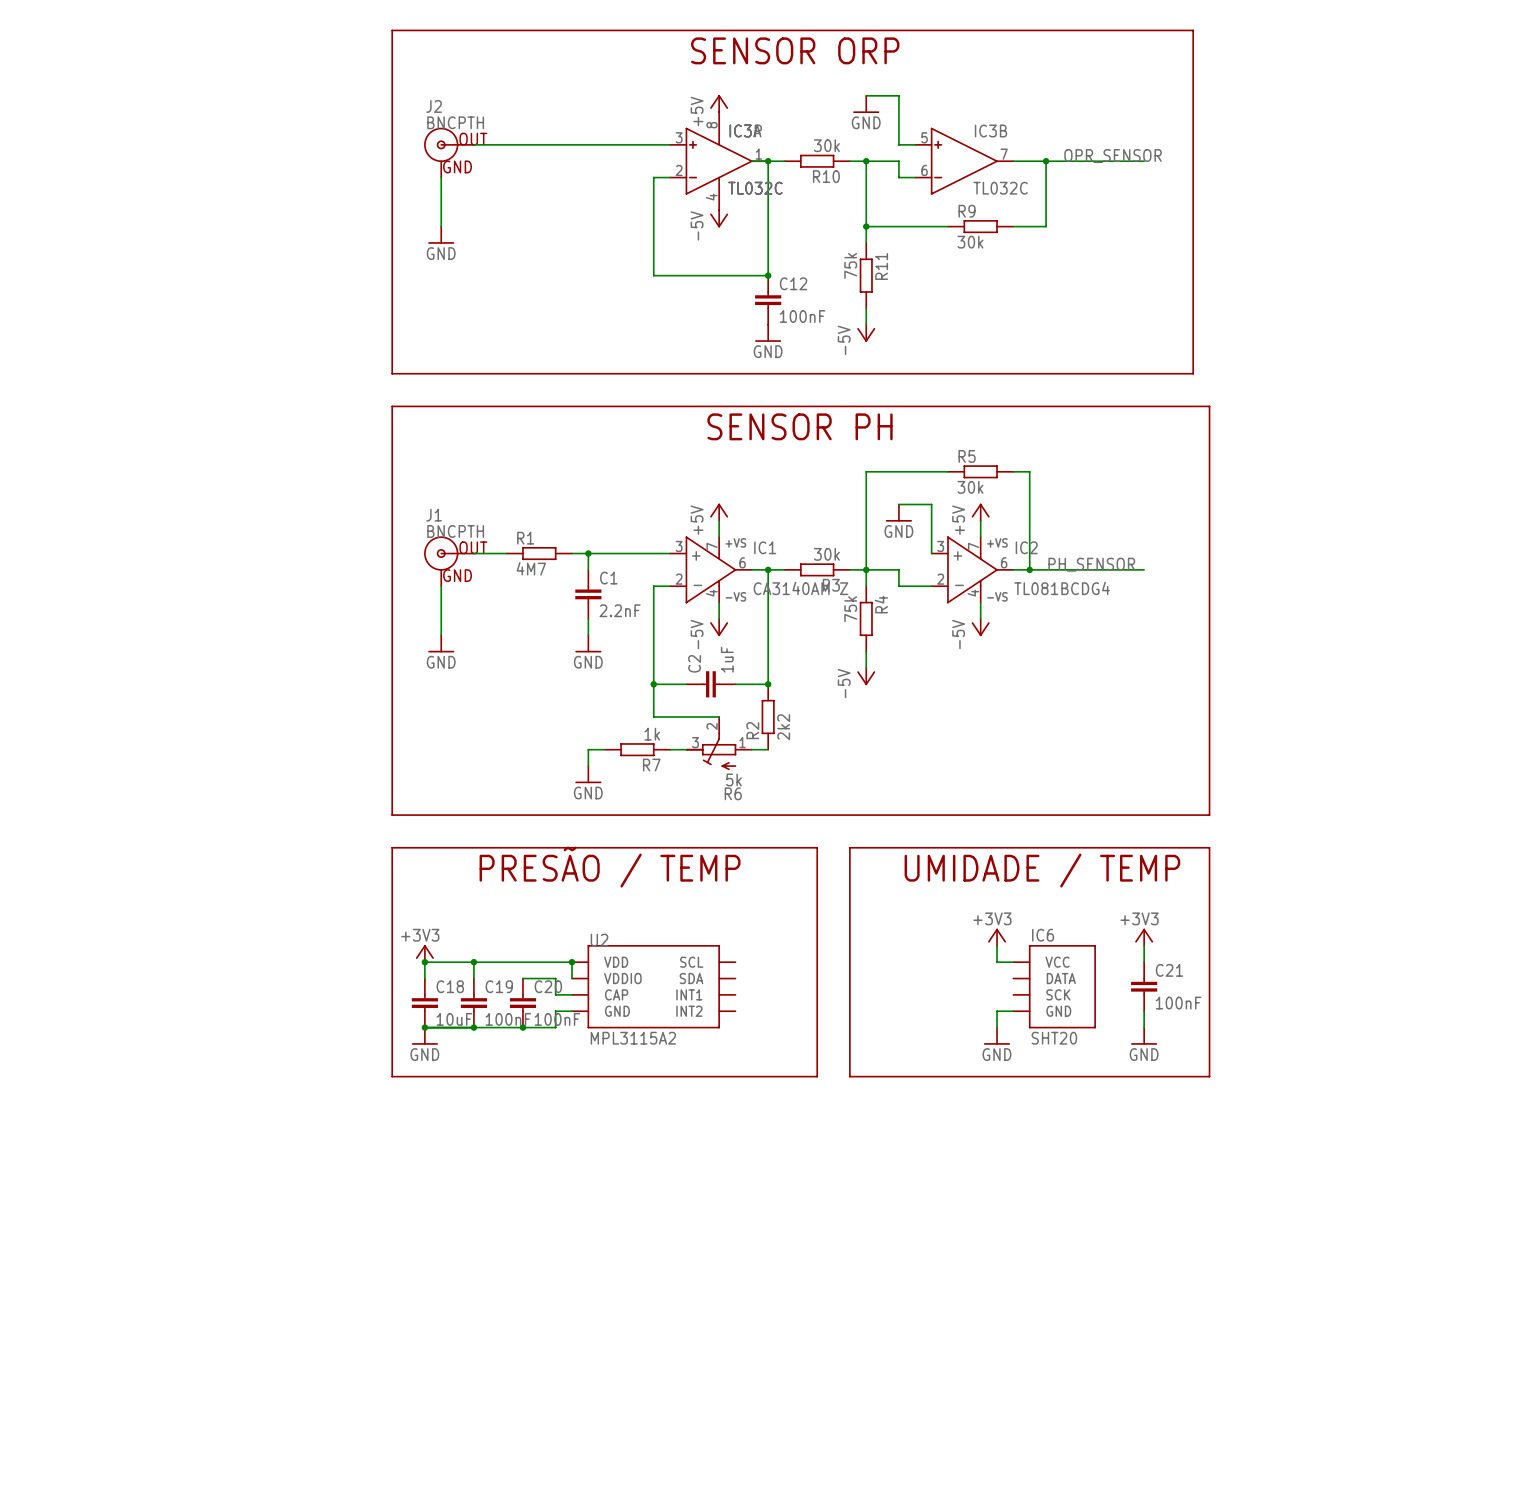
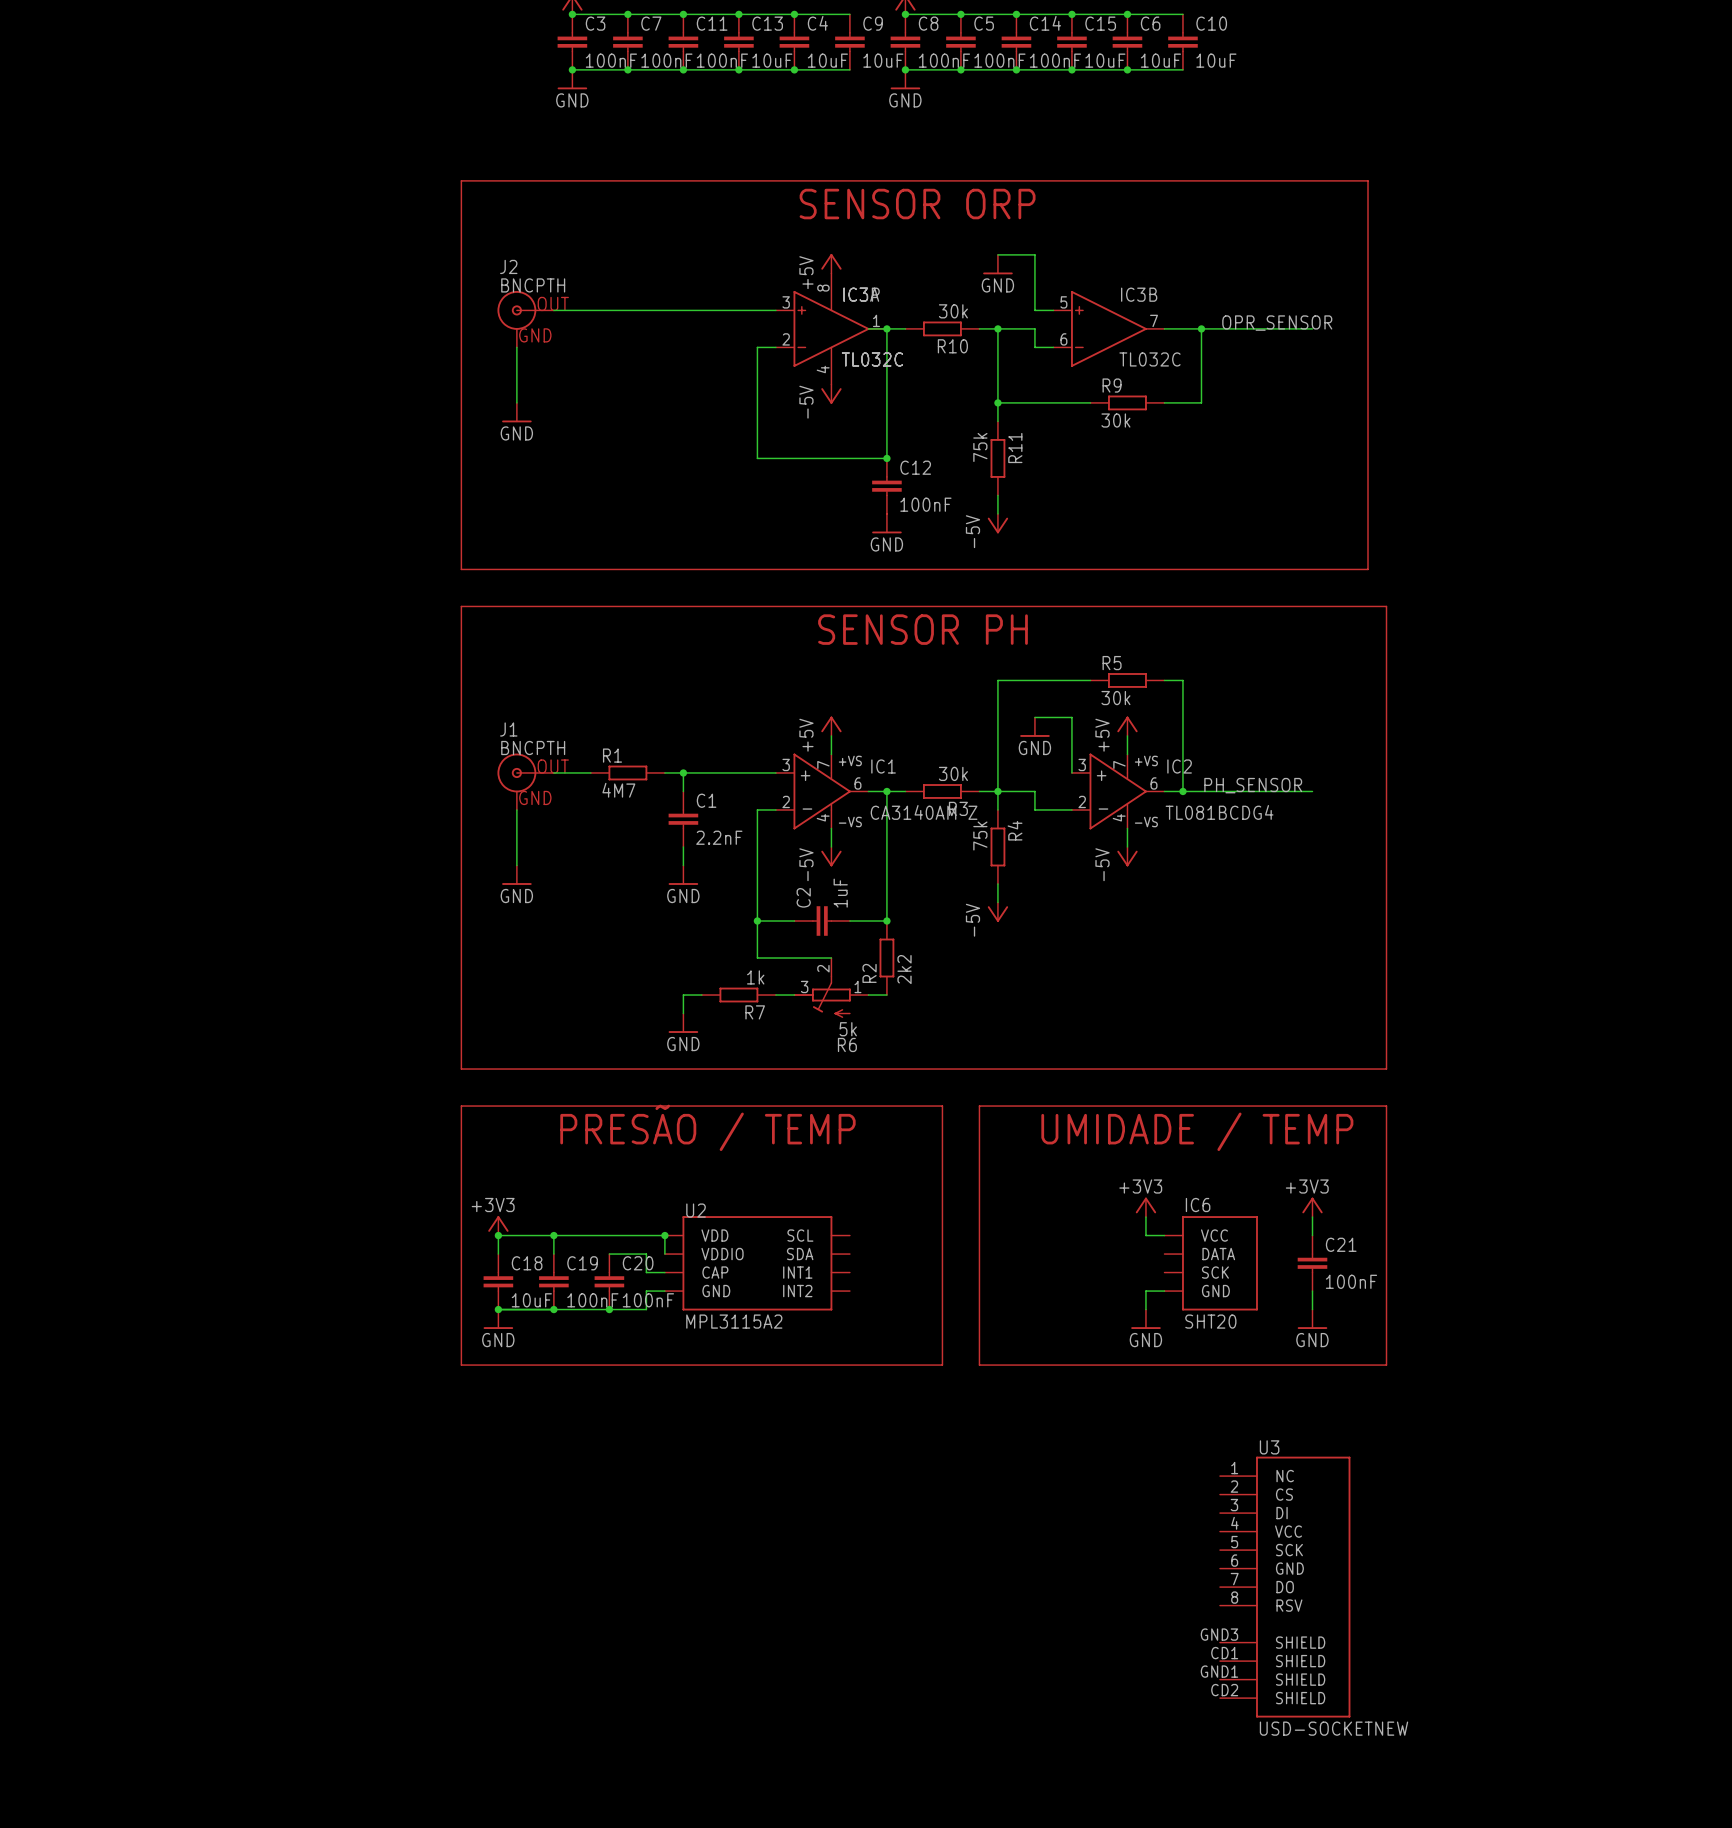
U3: none -> USD-SOCKETNEW (1285, 1587)

